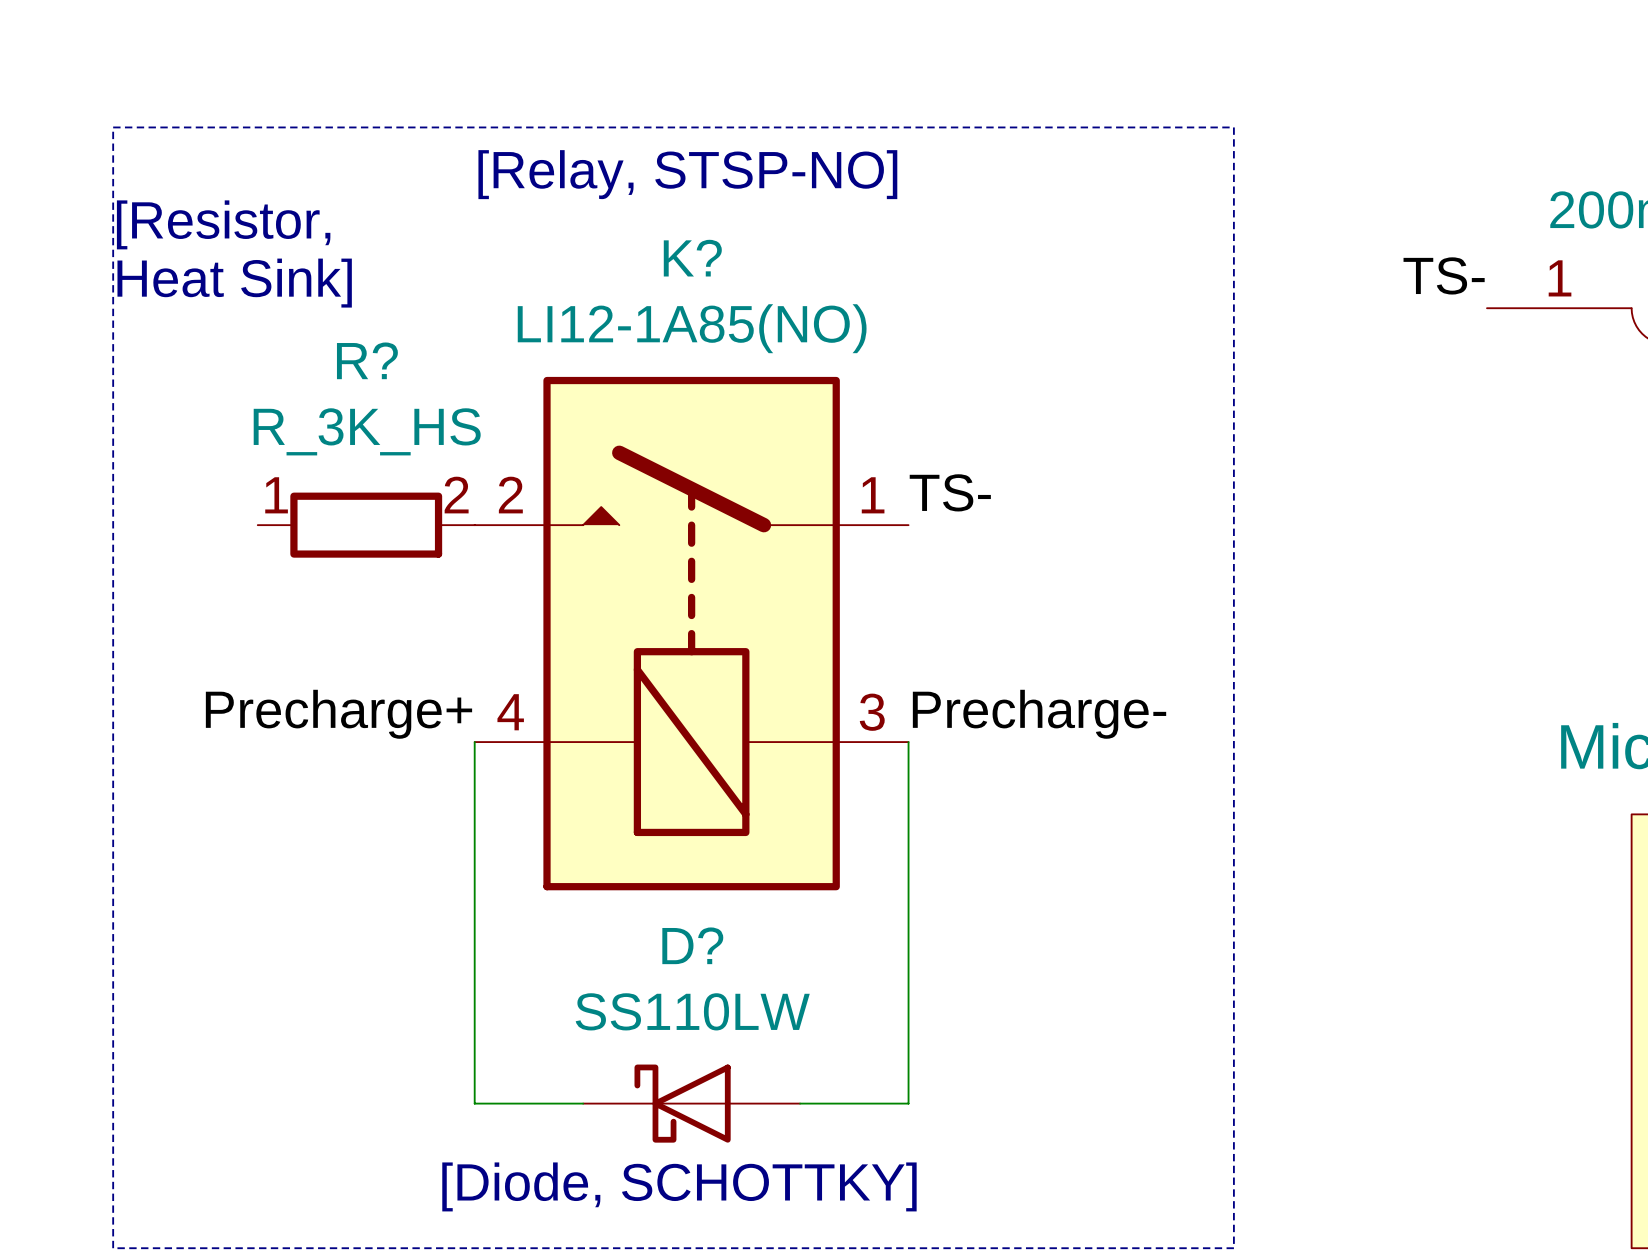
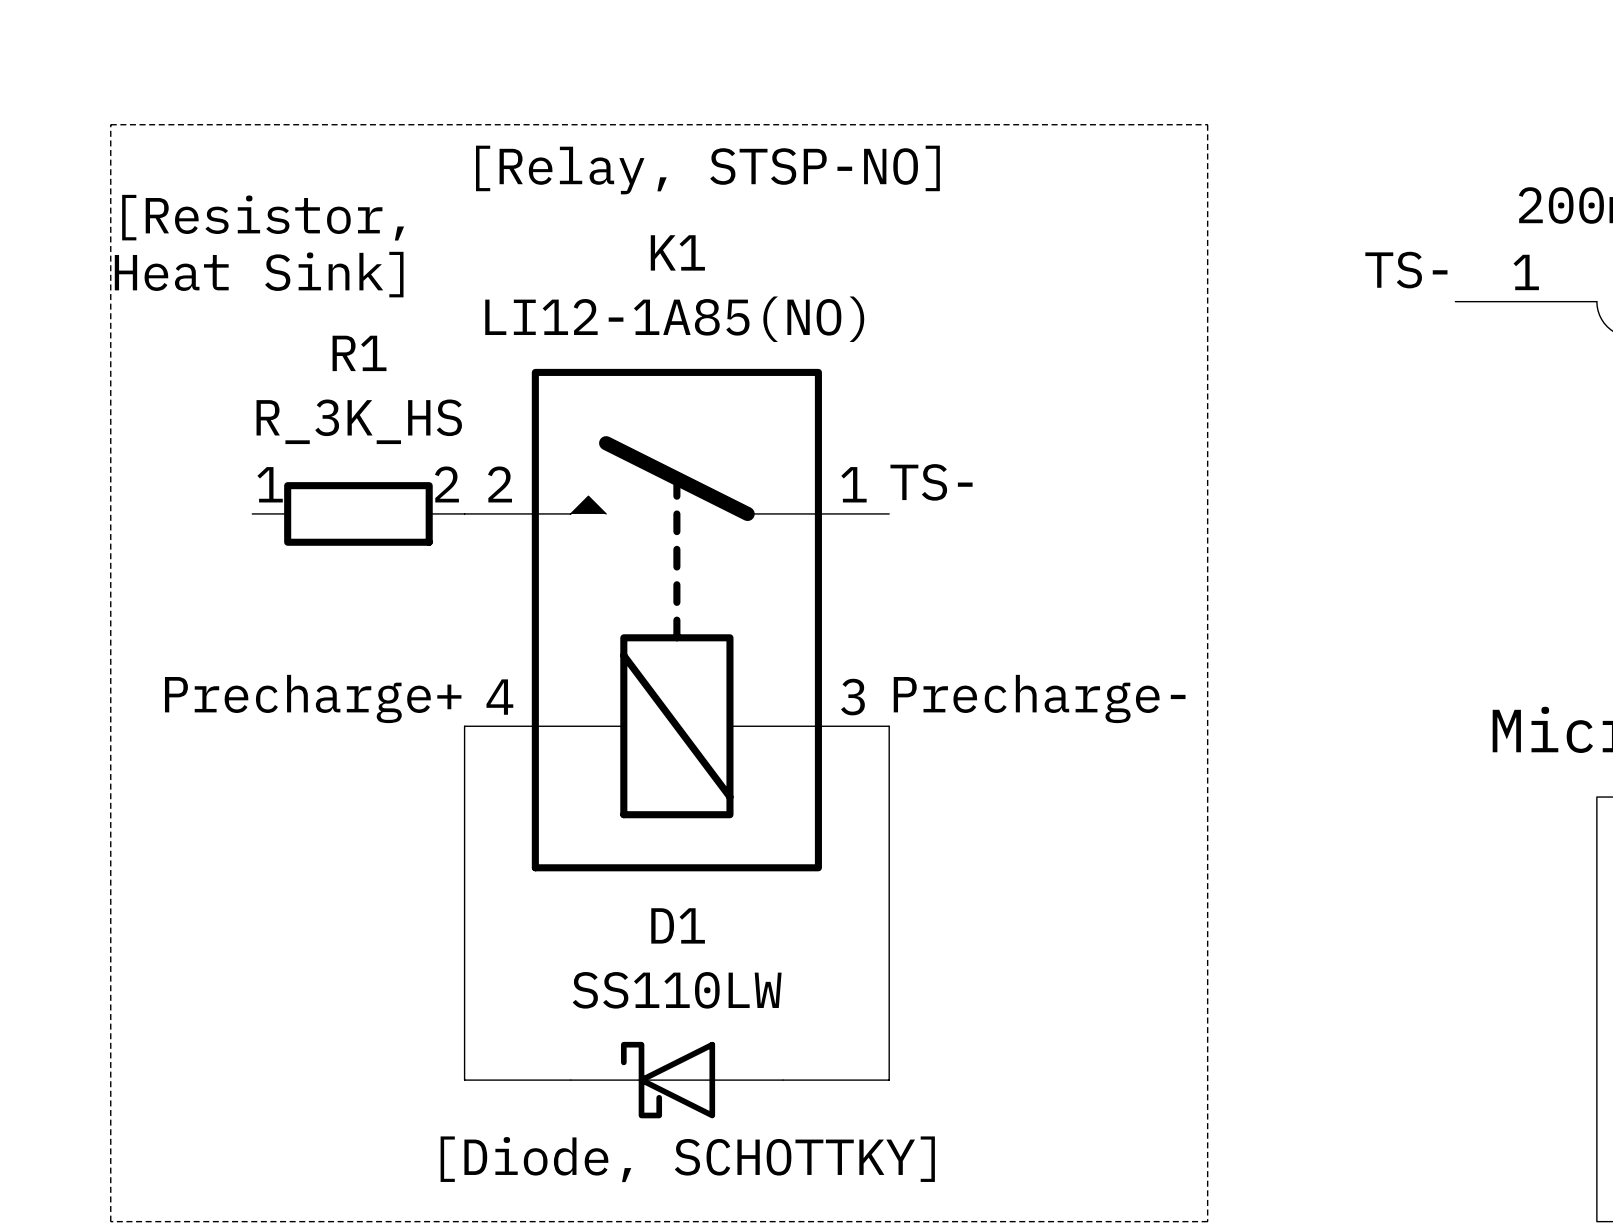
K? name: K? (692, 258) -> K1 (677, 252)
R? name: R? (367, 360) -> R1 (359, 353)
D? name: D? (692, 945) -> D1 (678, 925)

